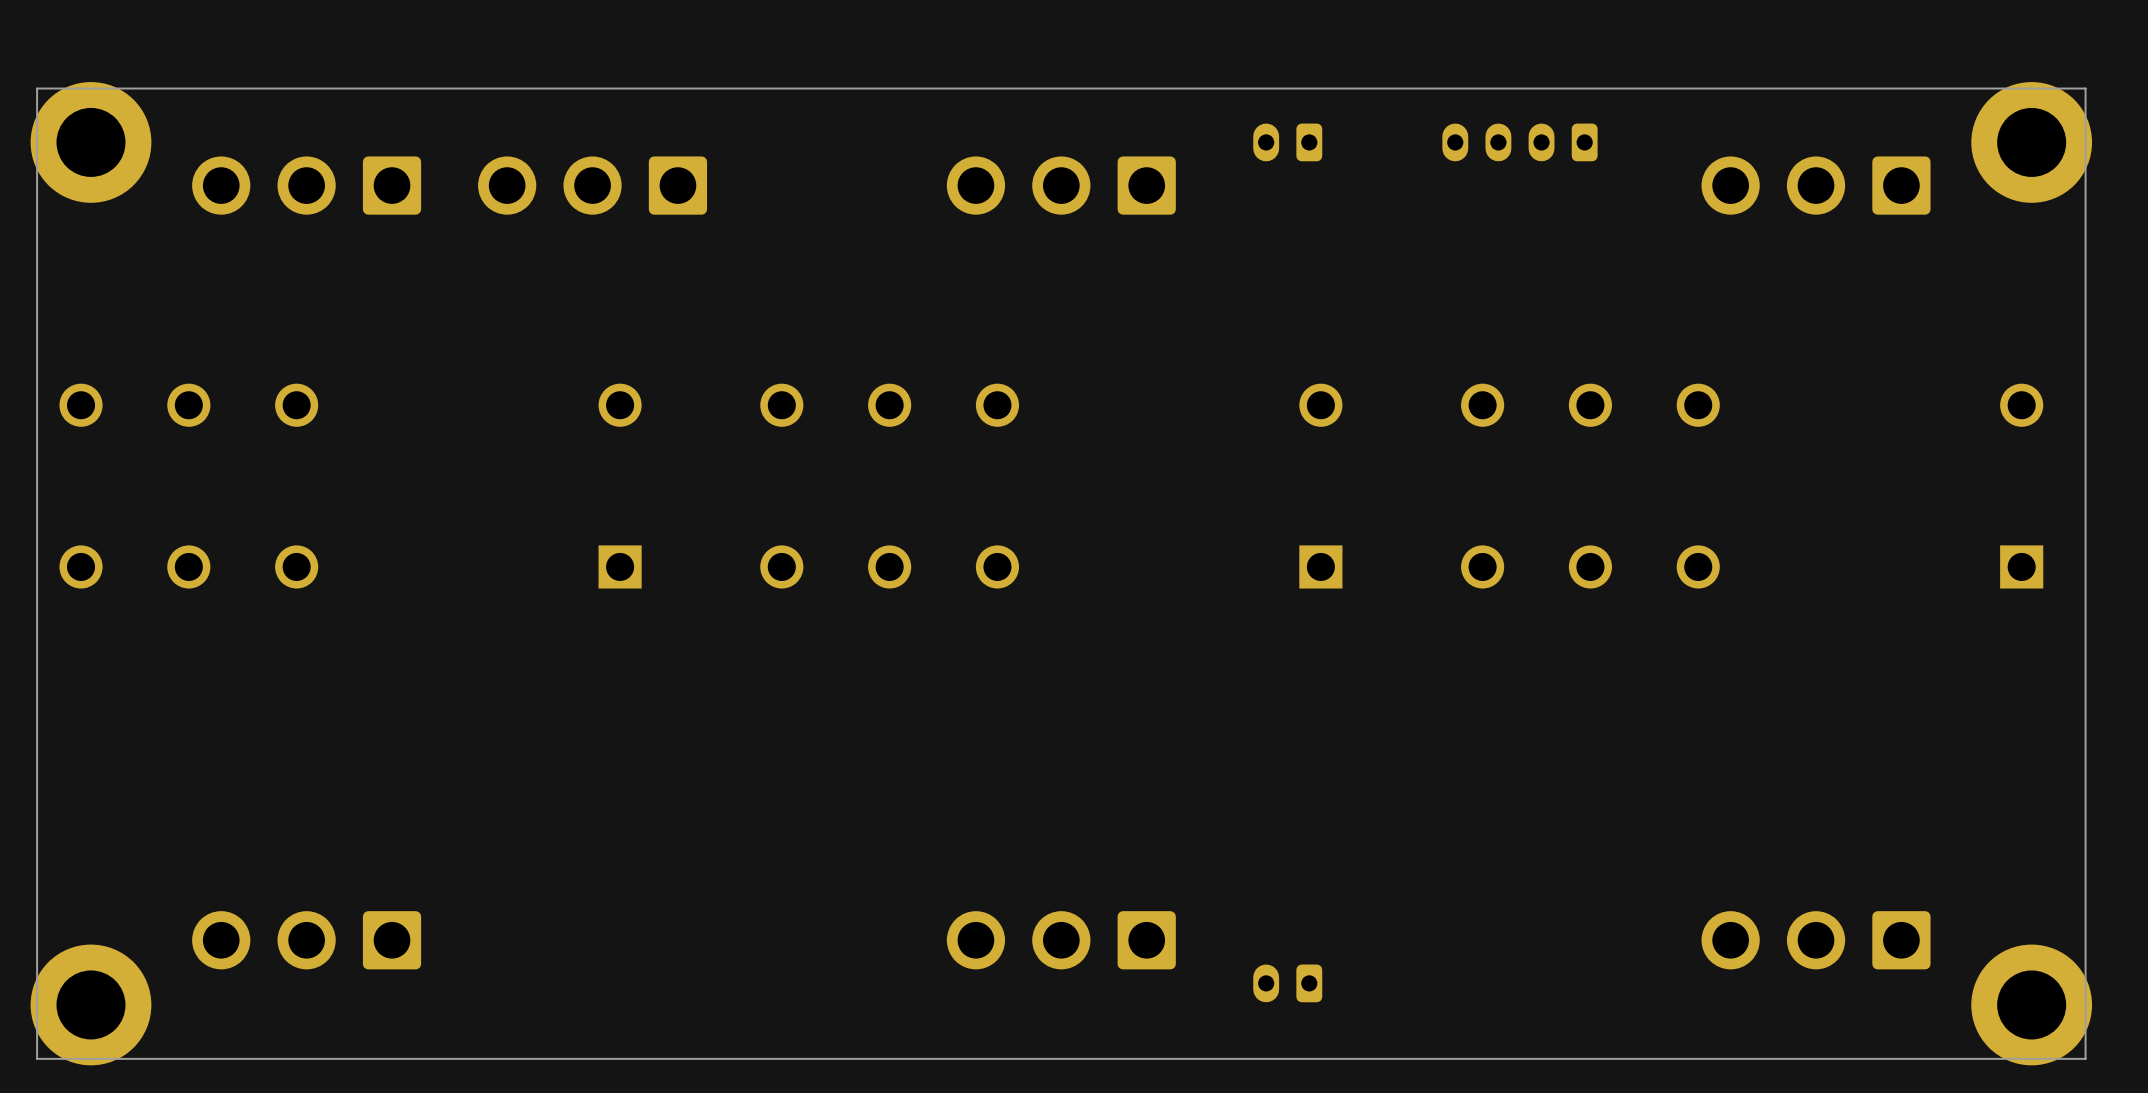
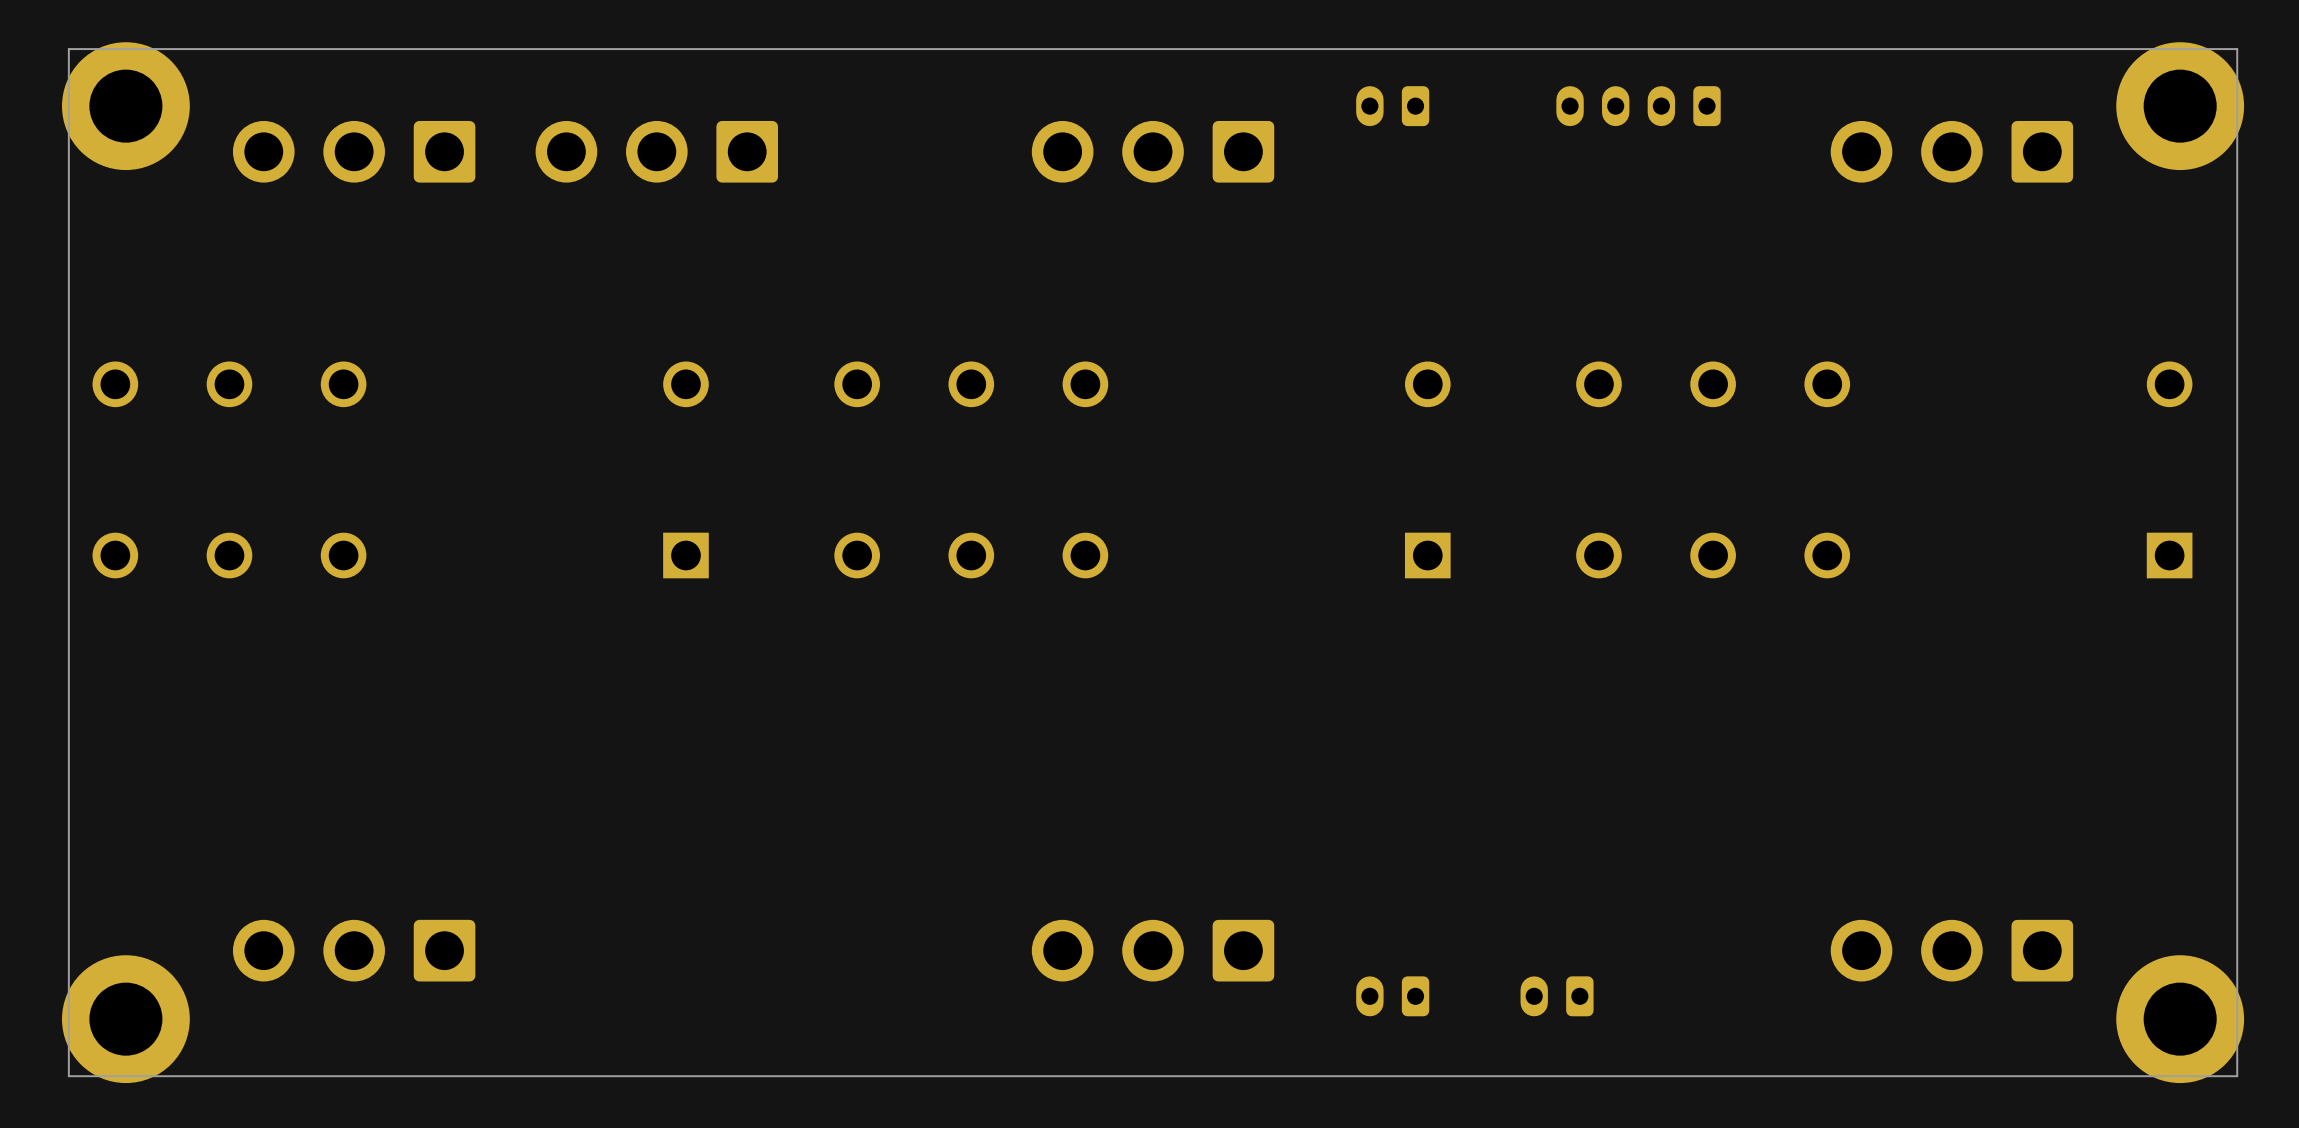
part: none -> (1557, 996)

